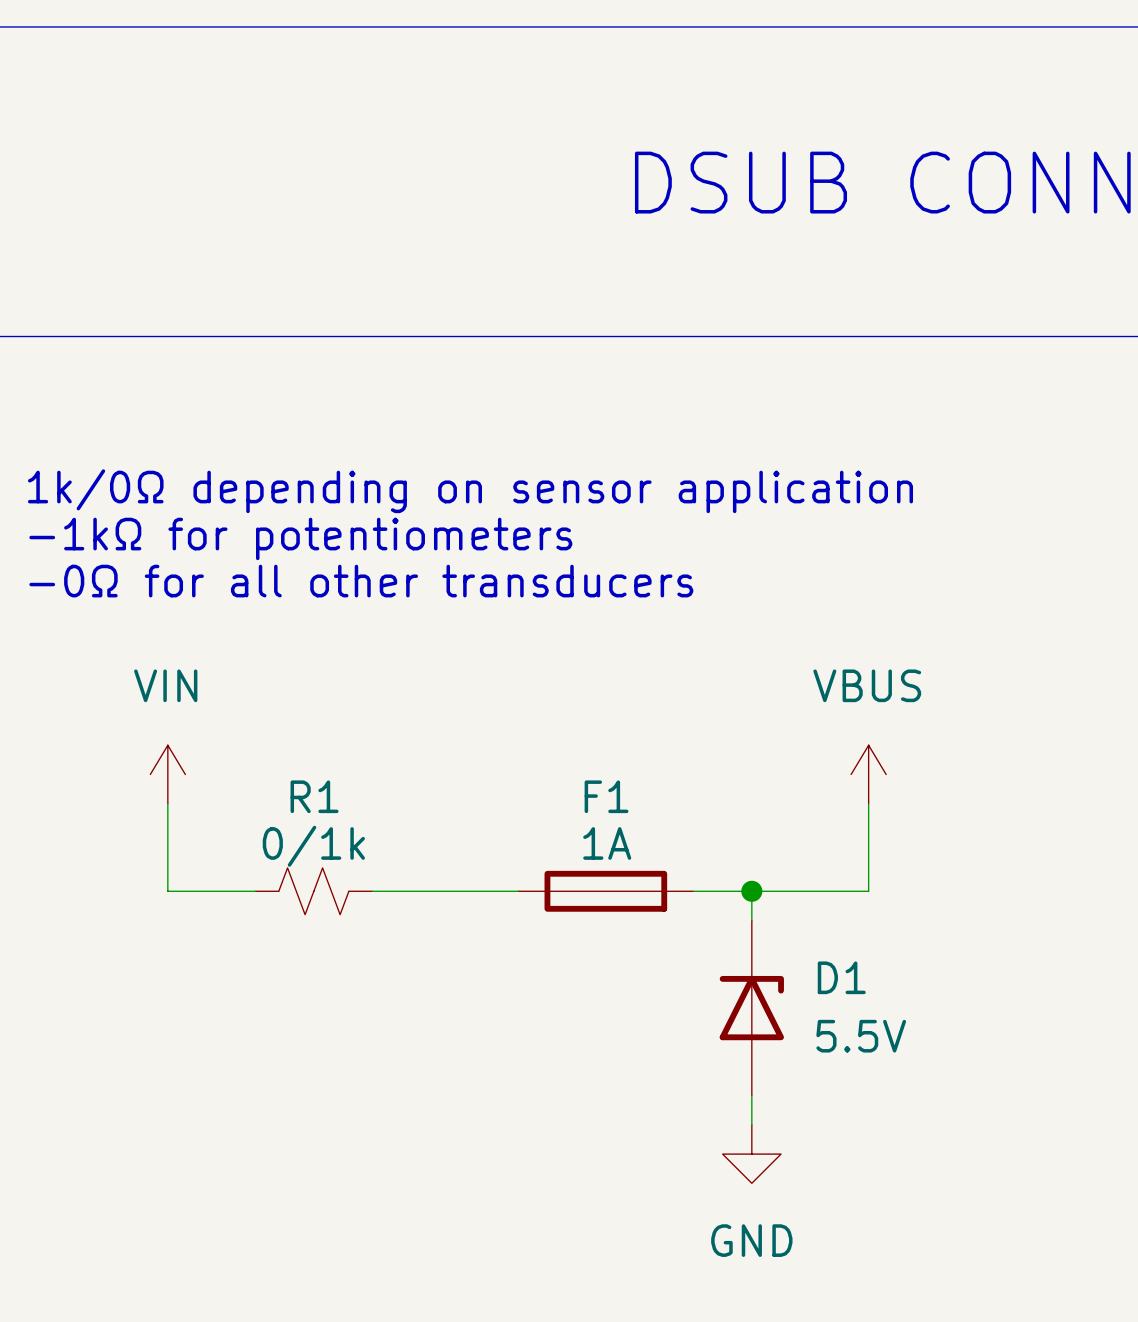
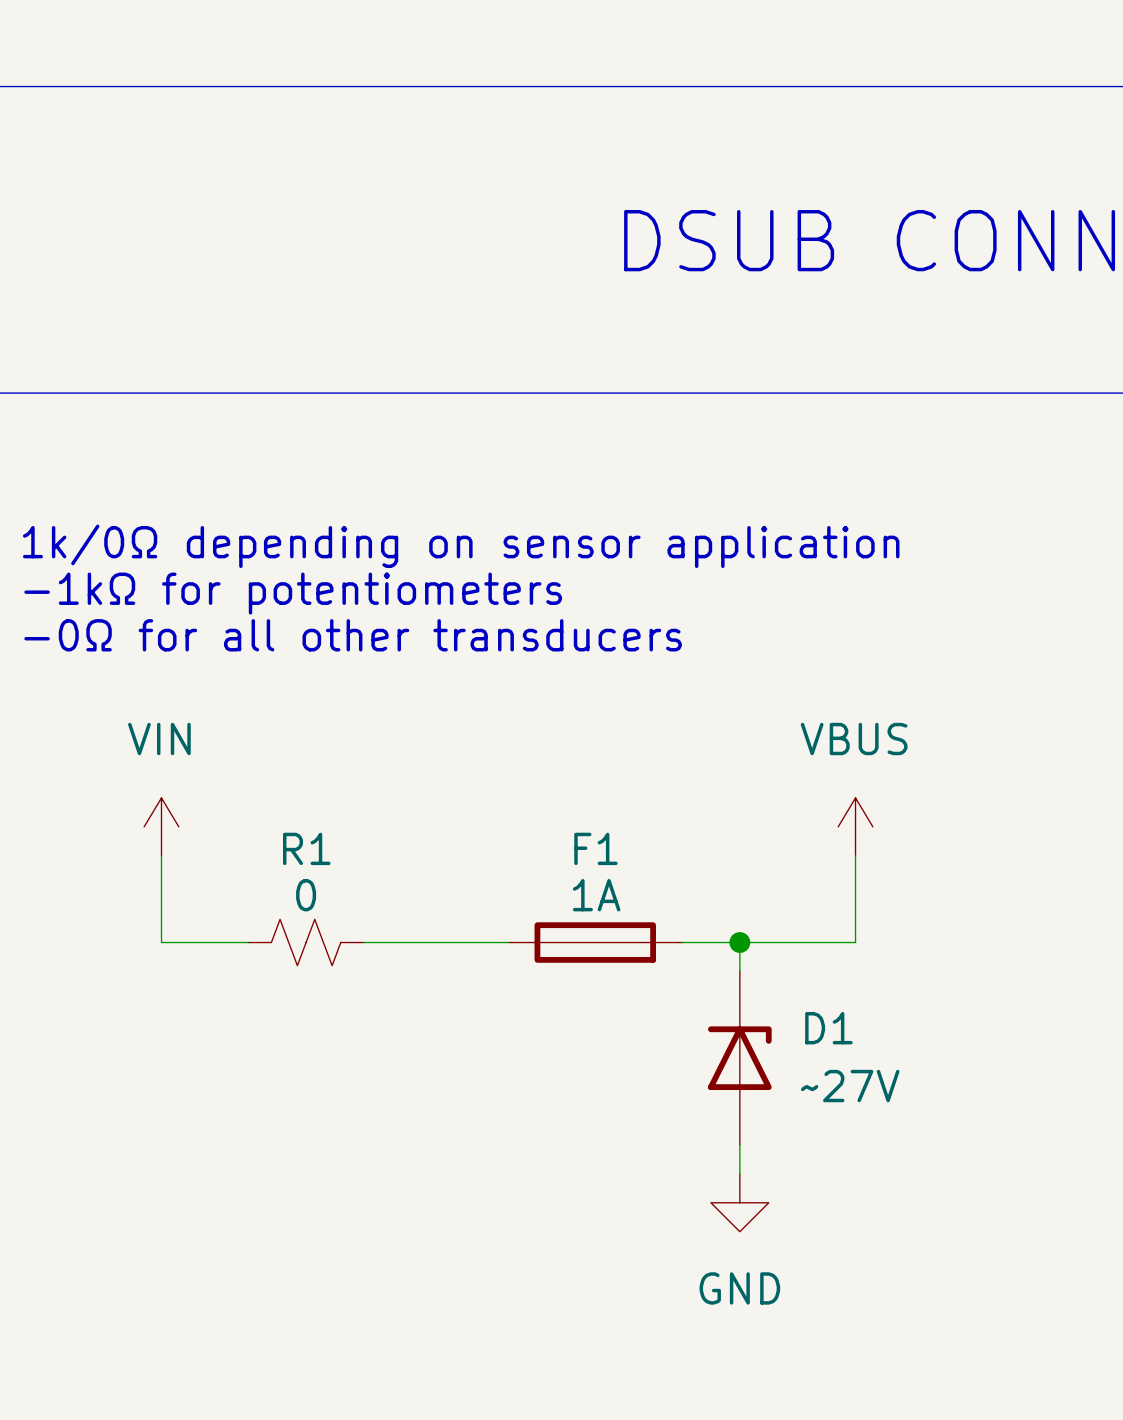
R1 value: 0/1k (313, 846) -> 0 (306, 895)
D1 value: 5.5V (861, 1036) -> ~27V (850, 1086)

